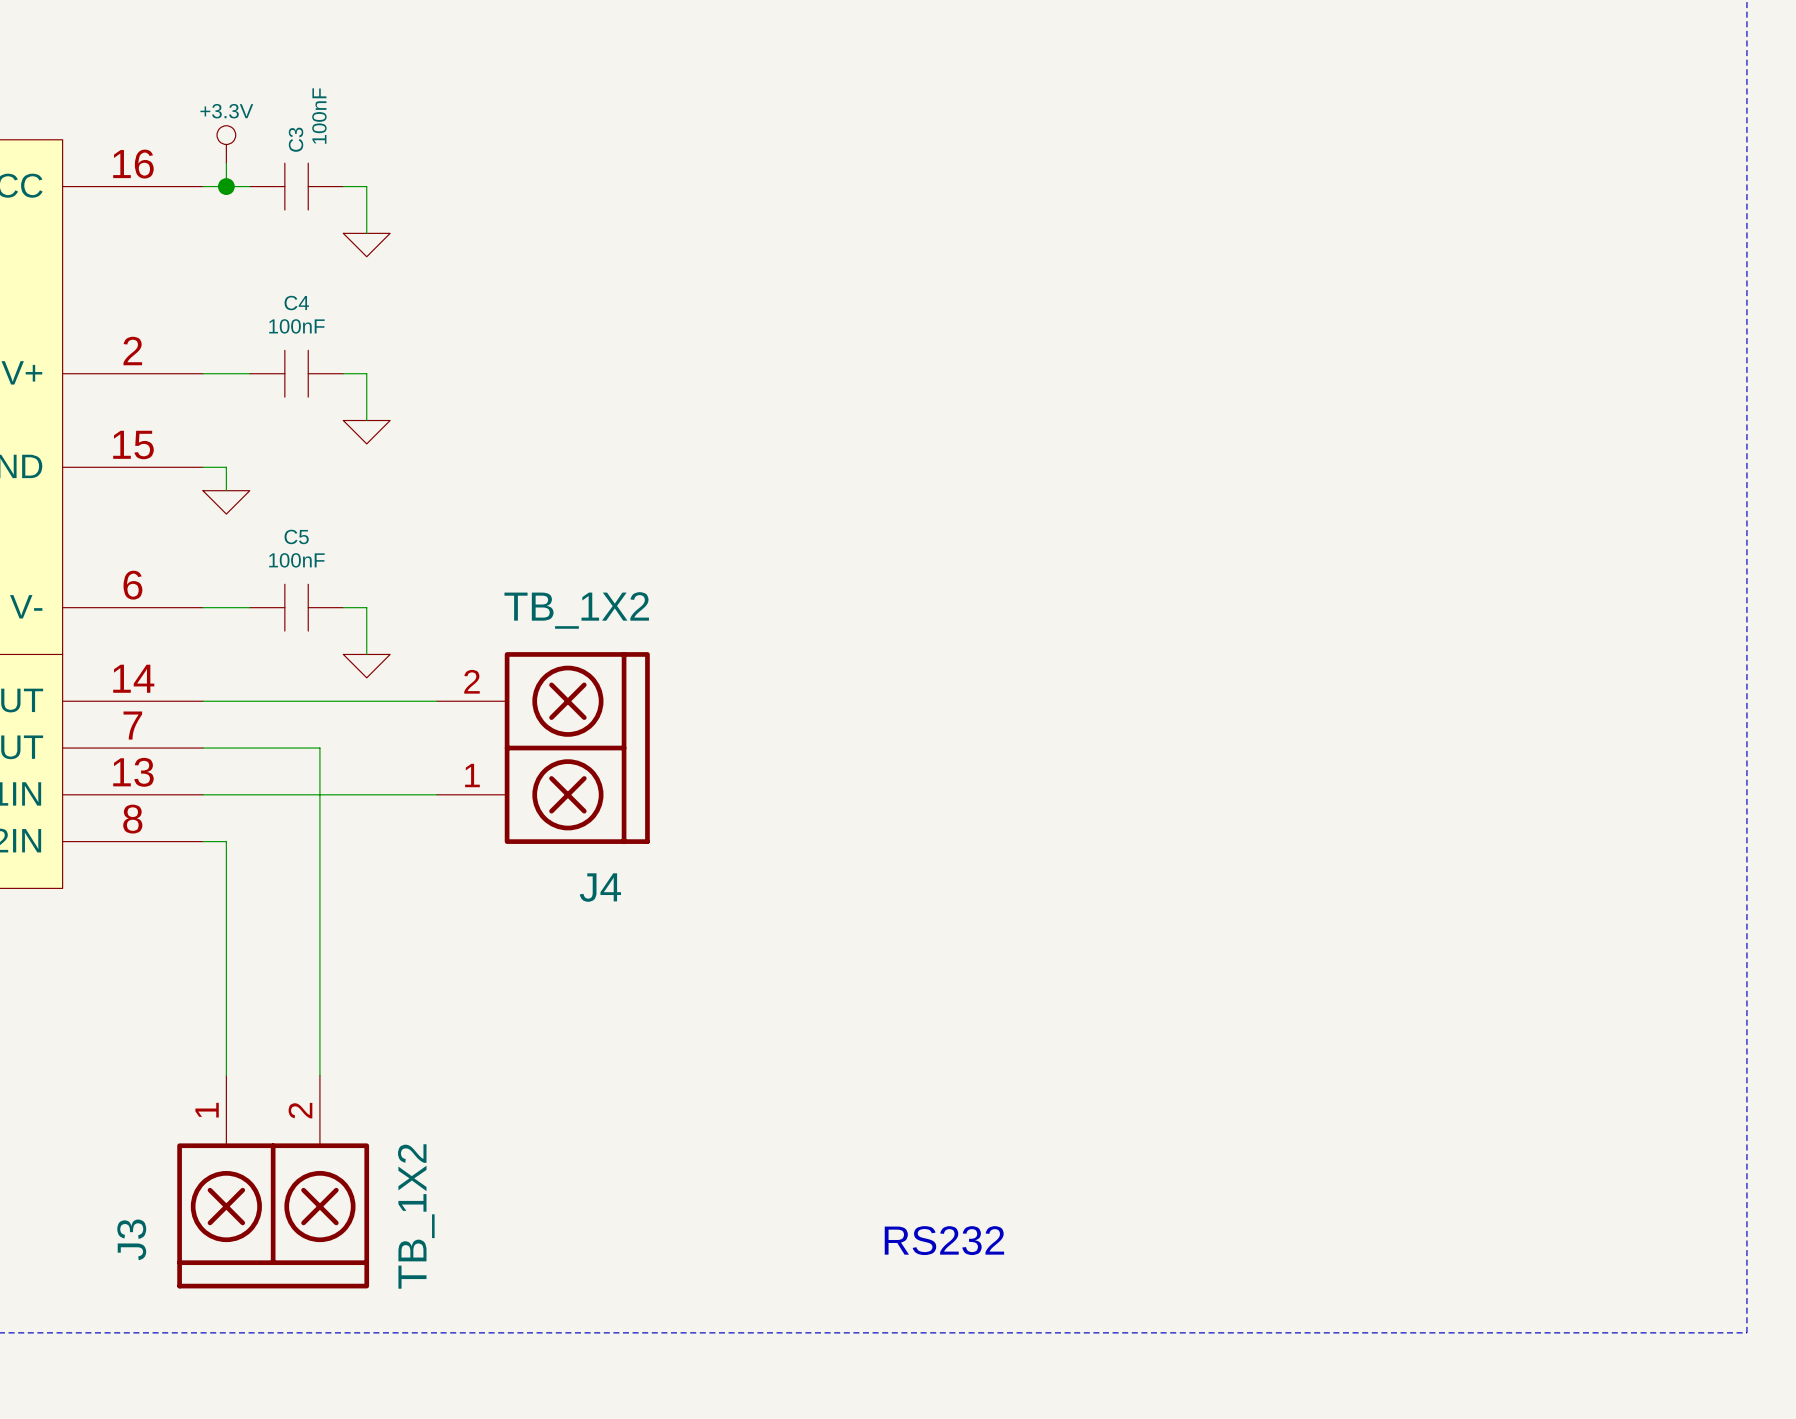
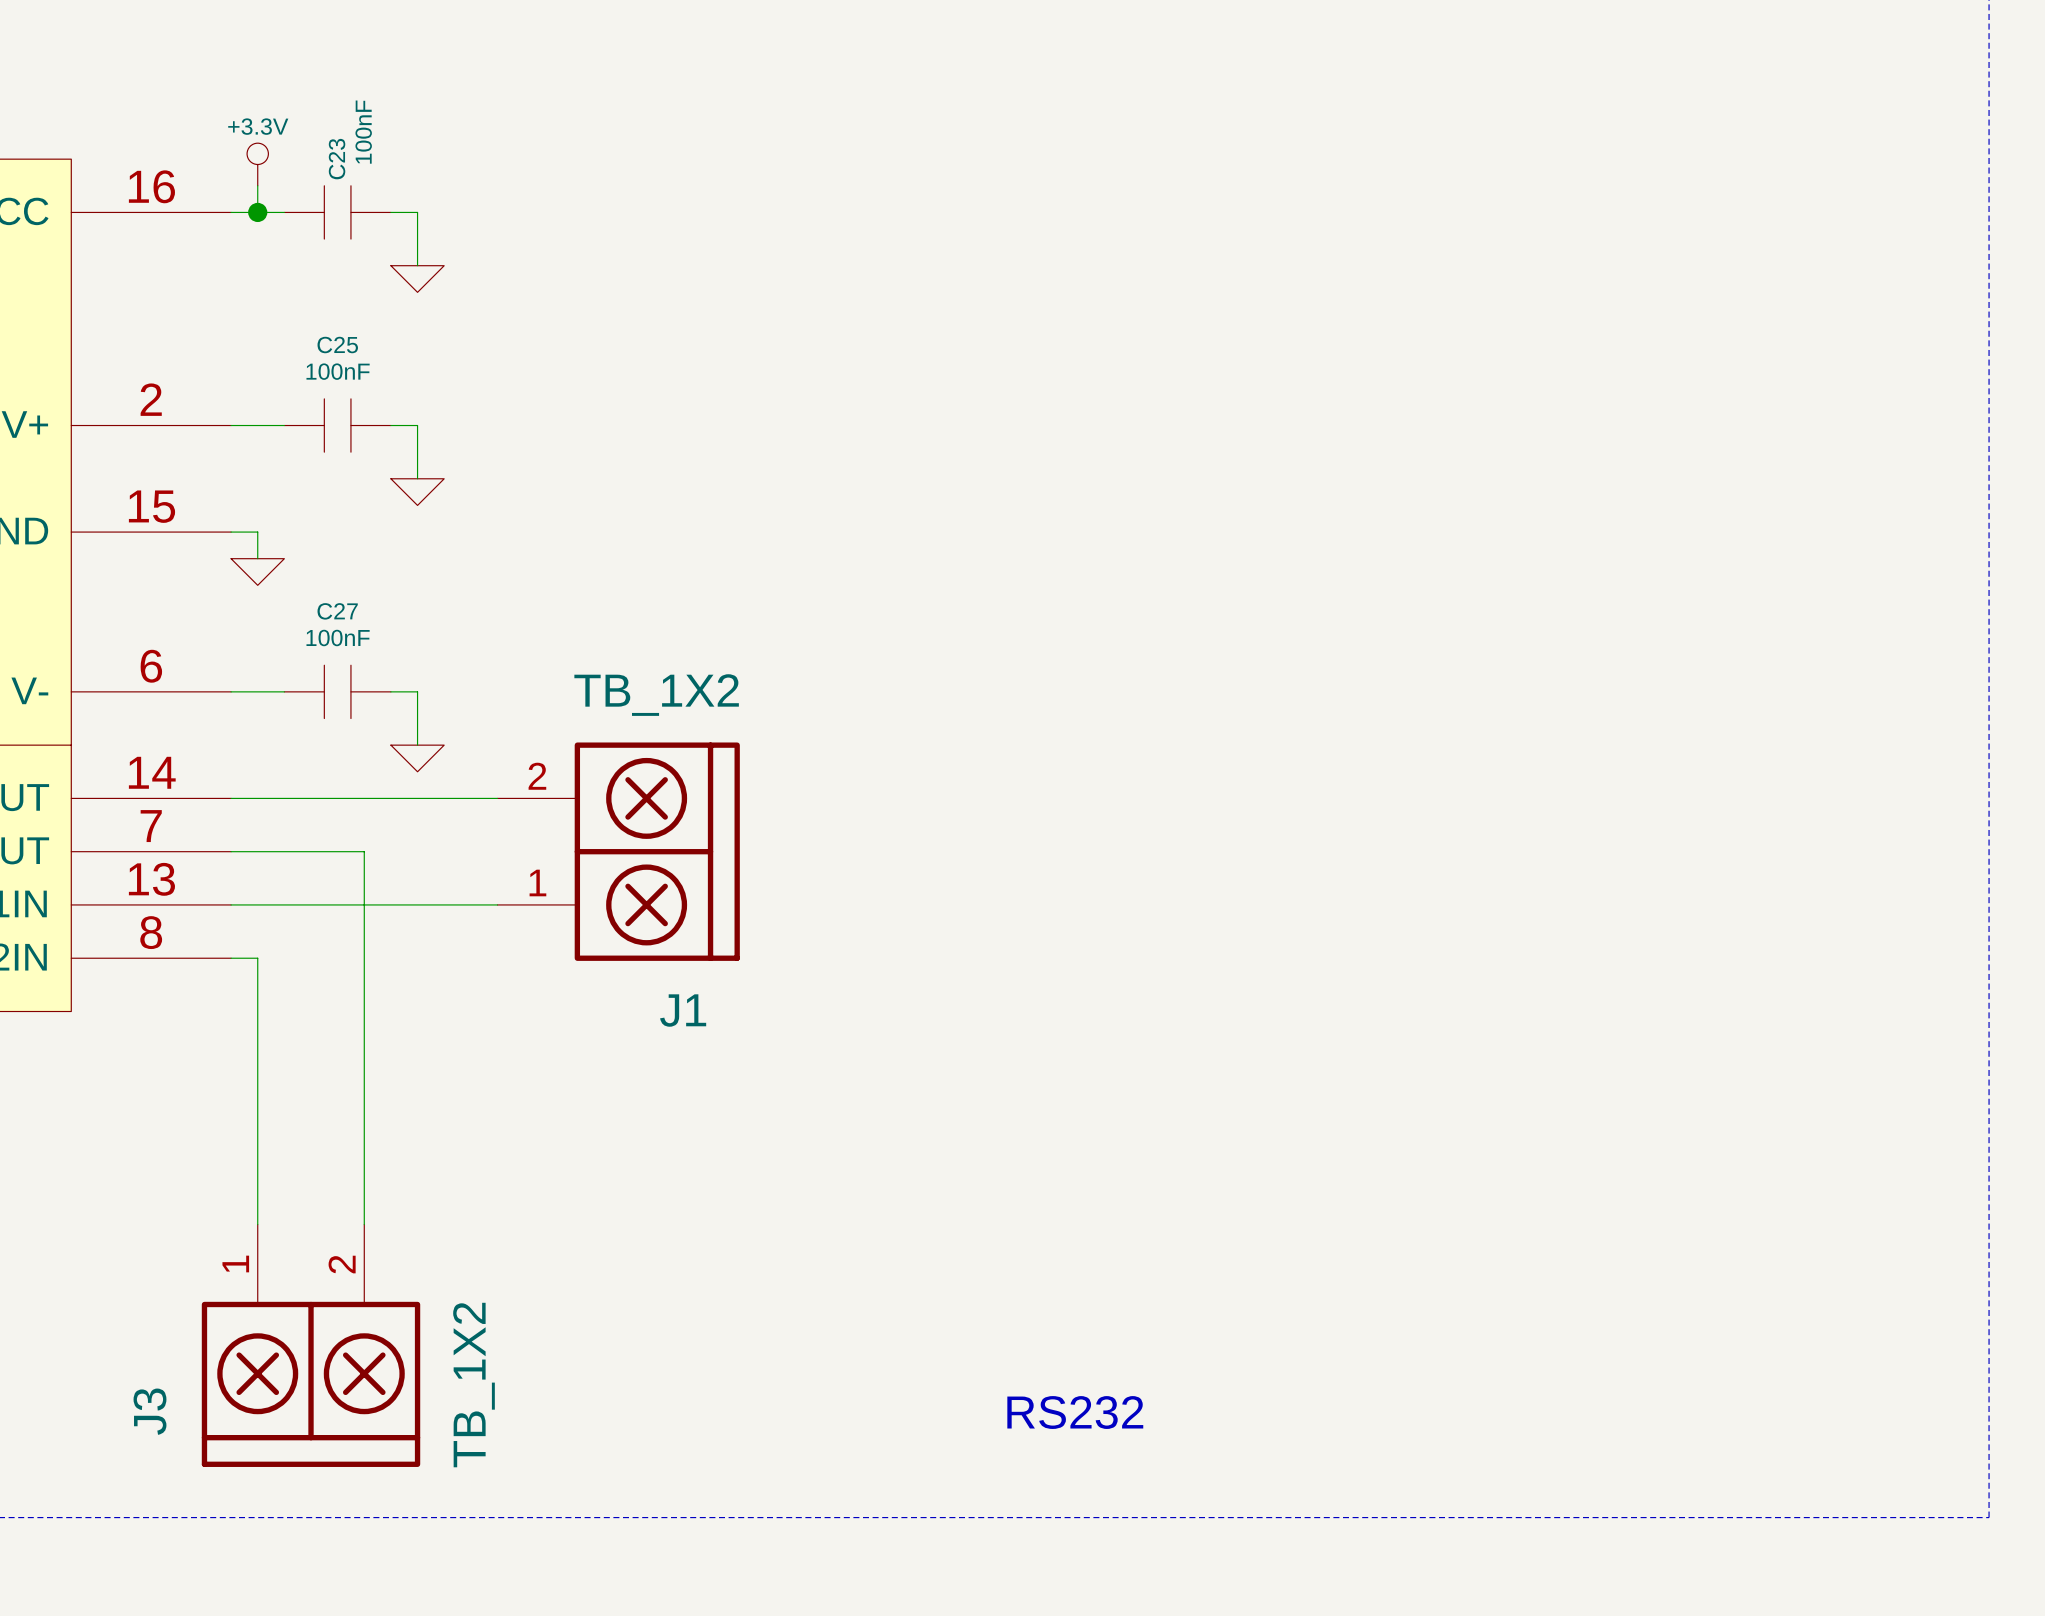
C3 name: C3 (296, 139) -> C23 (337, 159)
C4 name: C4 (296, 303) -> C25 (337, 345)
C5 name: C5 (296, 536) -> C27 (337, 611)
J4 name: J4 (600, 887) -> J1 (683, 1010)

